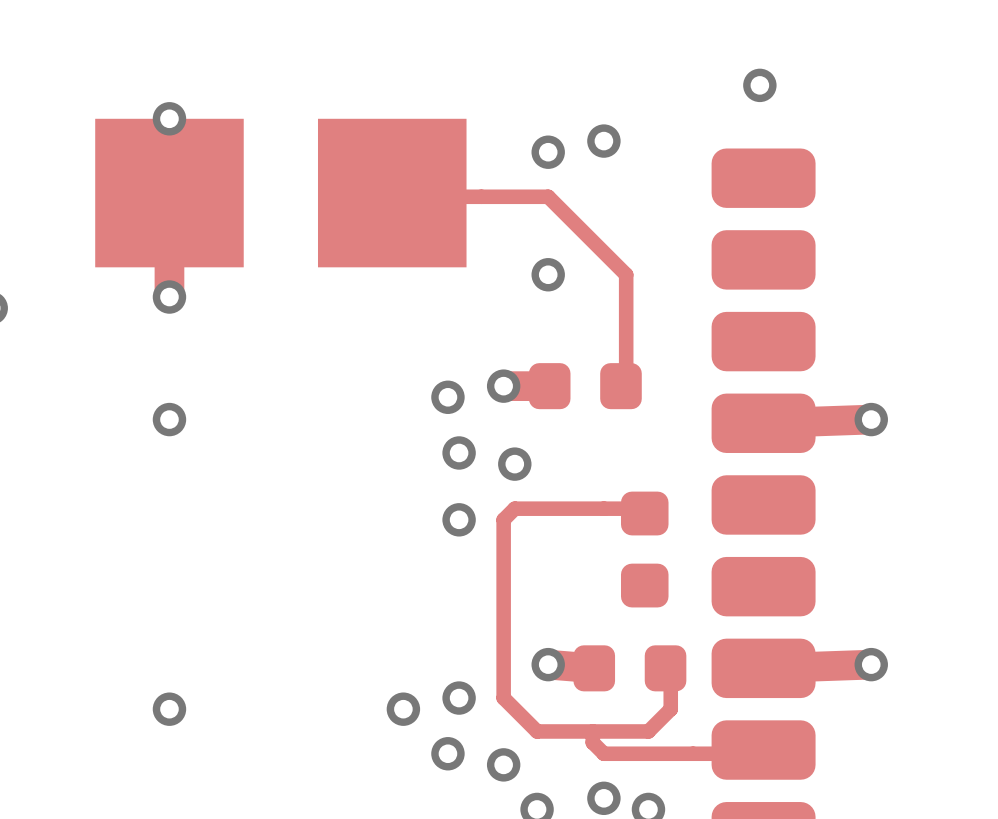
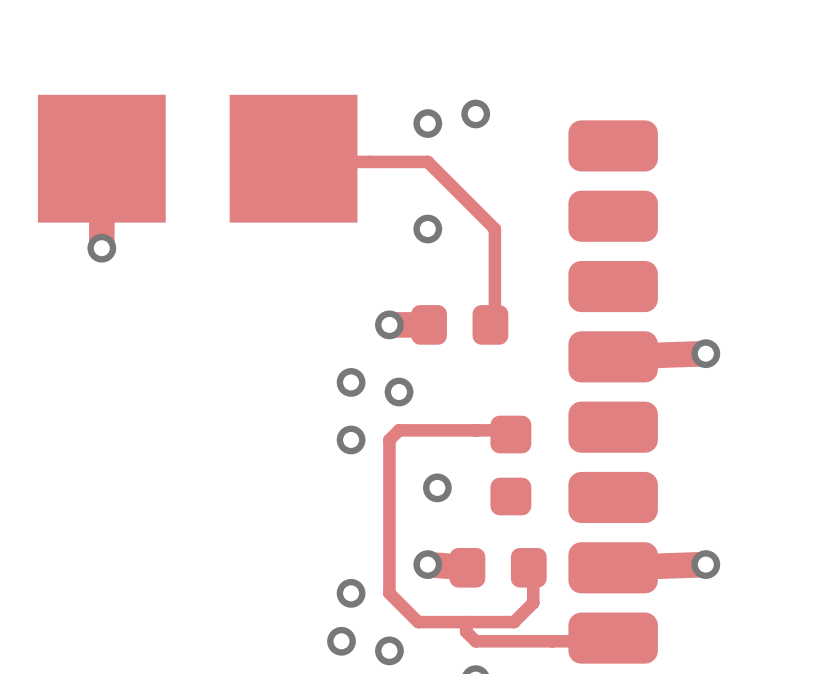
via: (759, 85) -> none
via: (169, 118) -> none
via: (447, 397) -> none
via: (169, 419) -> none
via: none -> (437, 487)
via: (169, 709) -> none
via: (403, 709) -> none

